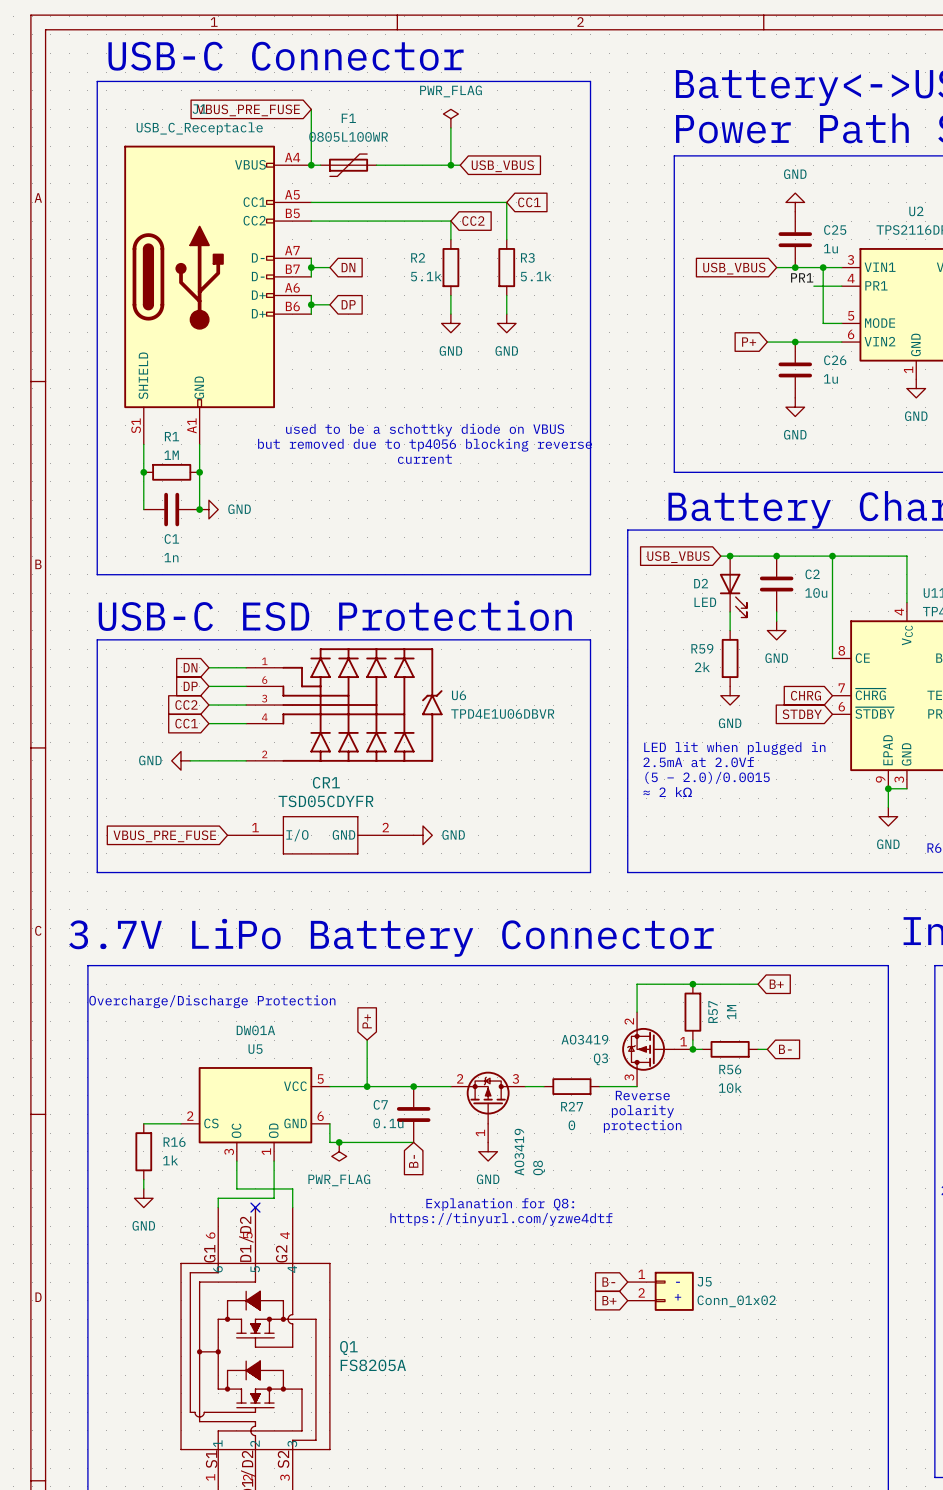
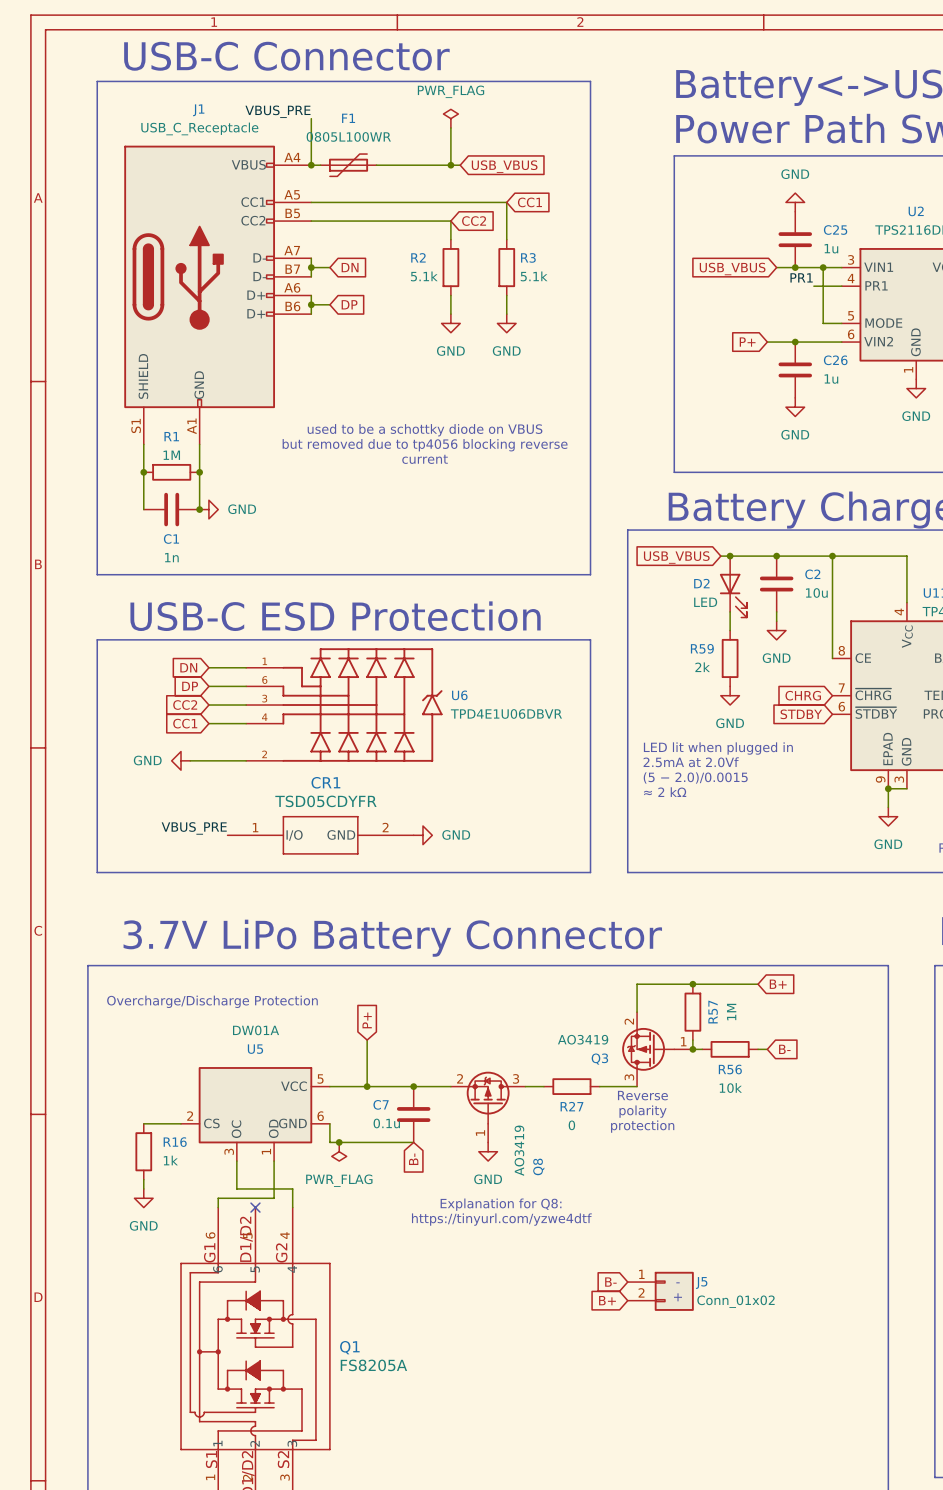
wire: (311, 109) (311, 118) -> none
global label: VBUS_PRE_FUSE (248, 110) -> none
label: none -> VBUS_PRE (277, 111)
label: none -> VBUS_PRE (194, 828)
global label: VBUS_PRE_FUSE (164, 836) -> none

